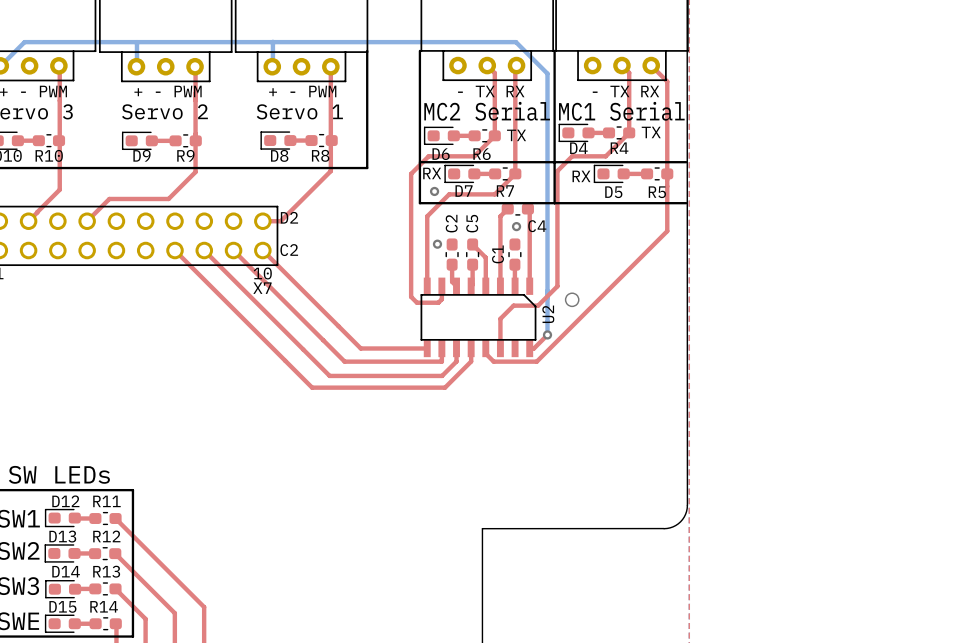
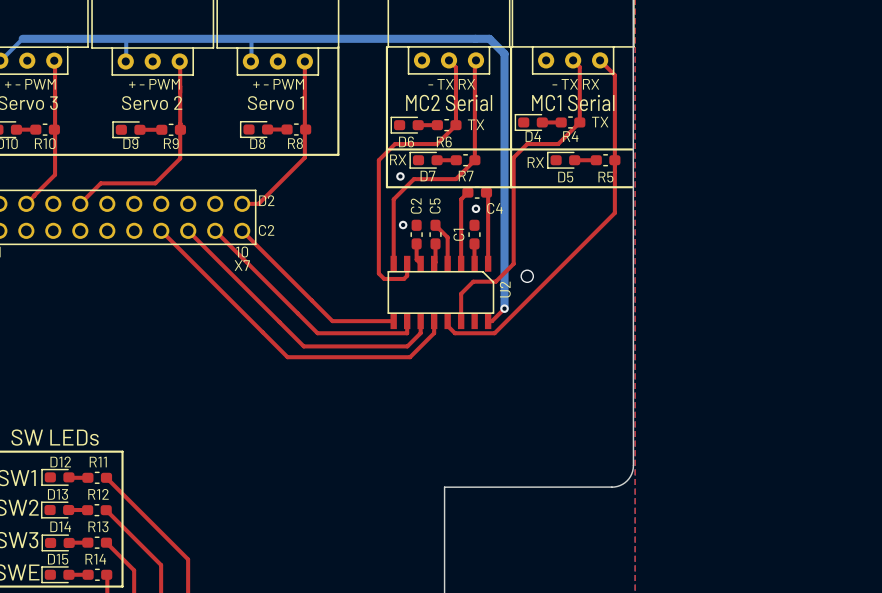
bottom track: none -> (22, 38) (489, 38) (504, 53) (504, 308)
bottom track: (515, 42) (547, 73) -> none

